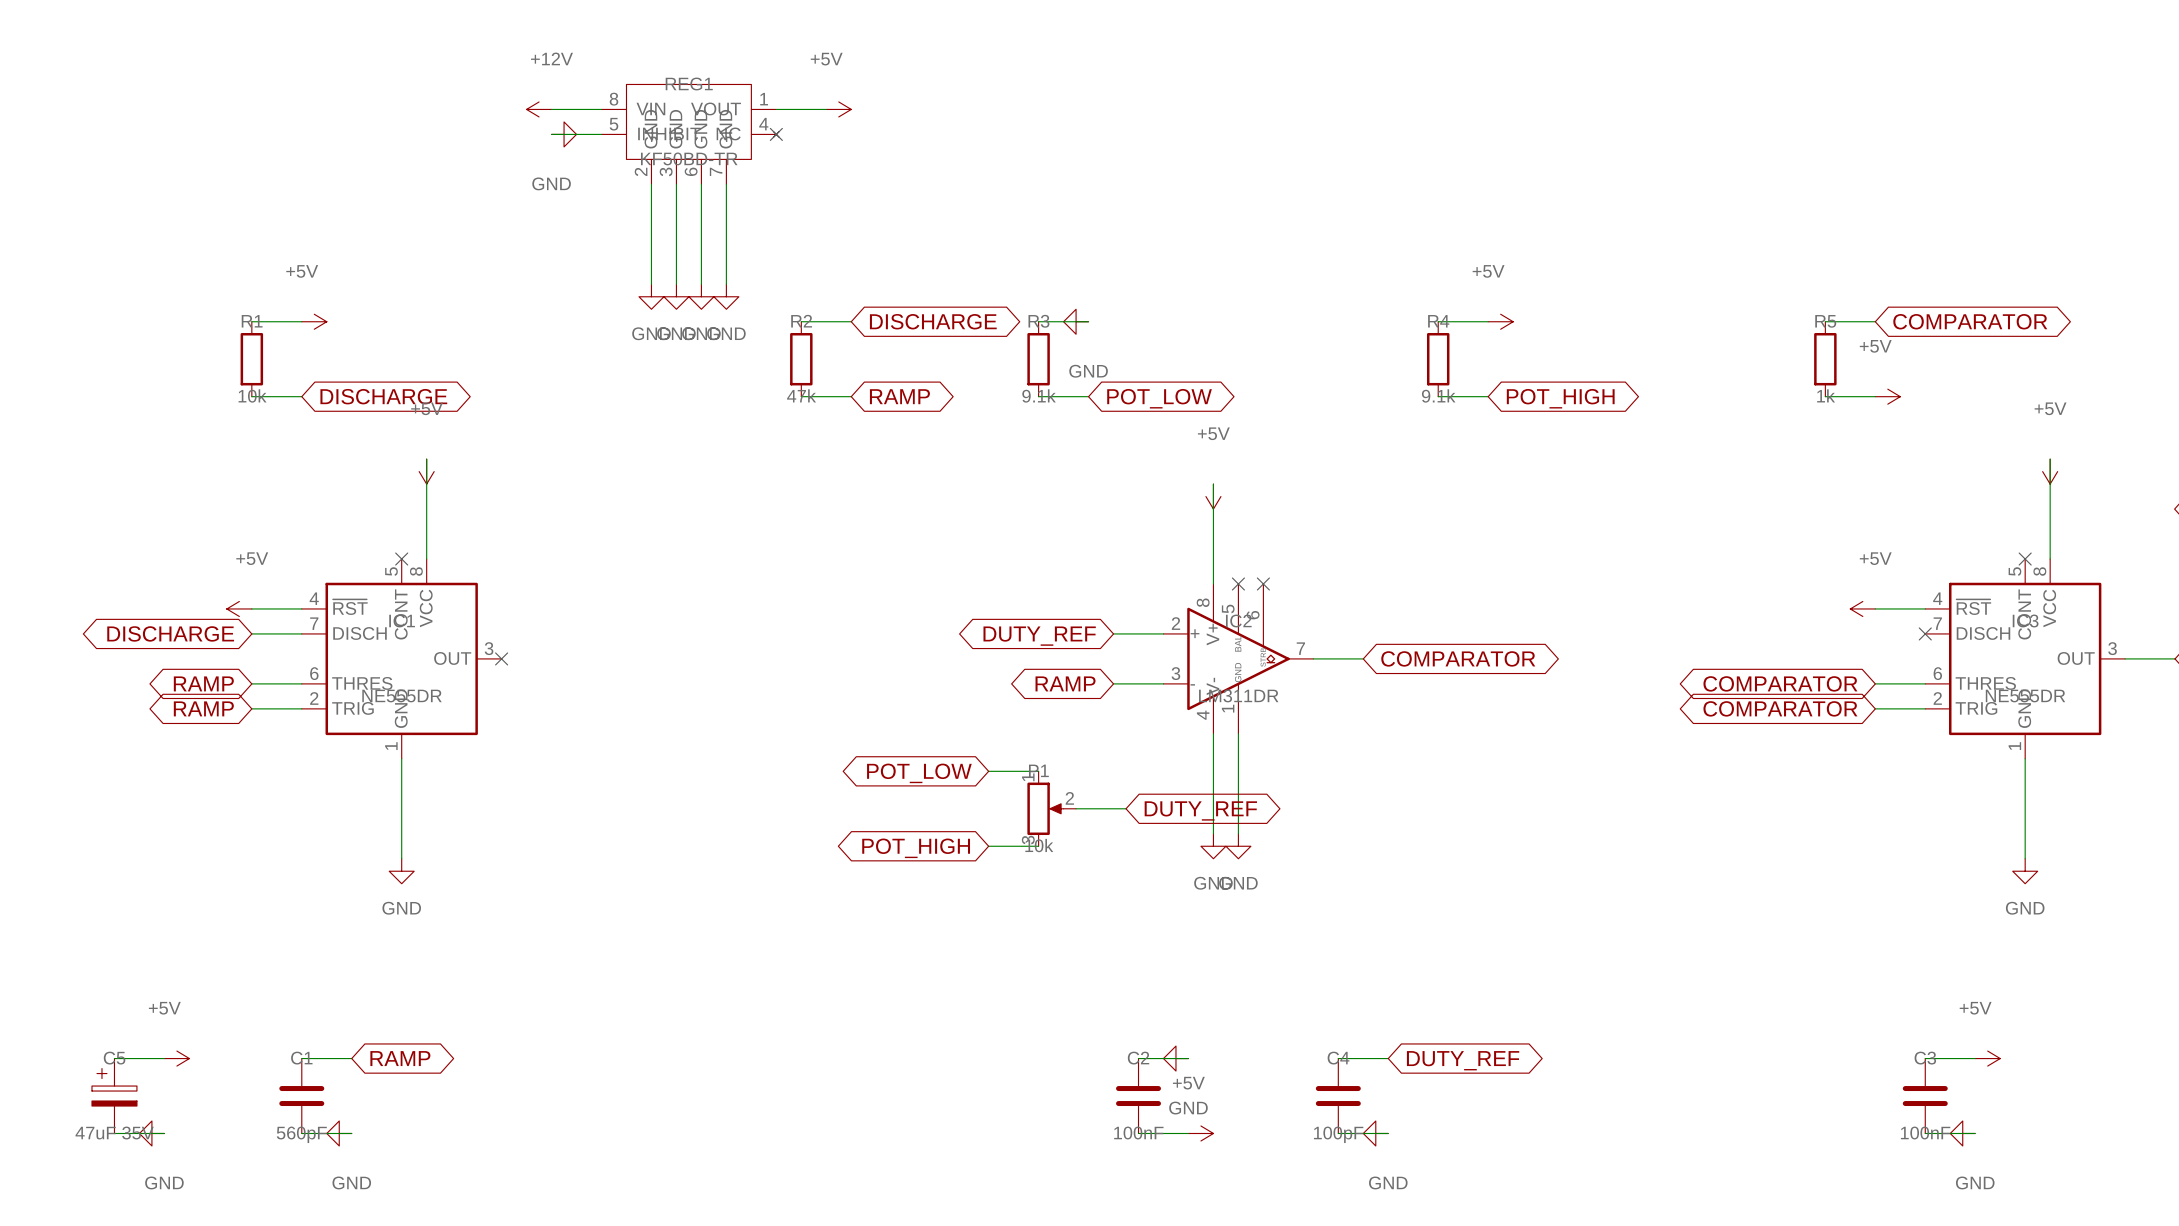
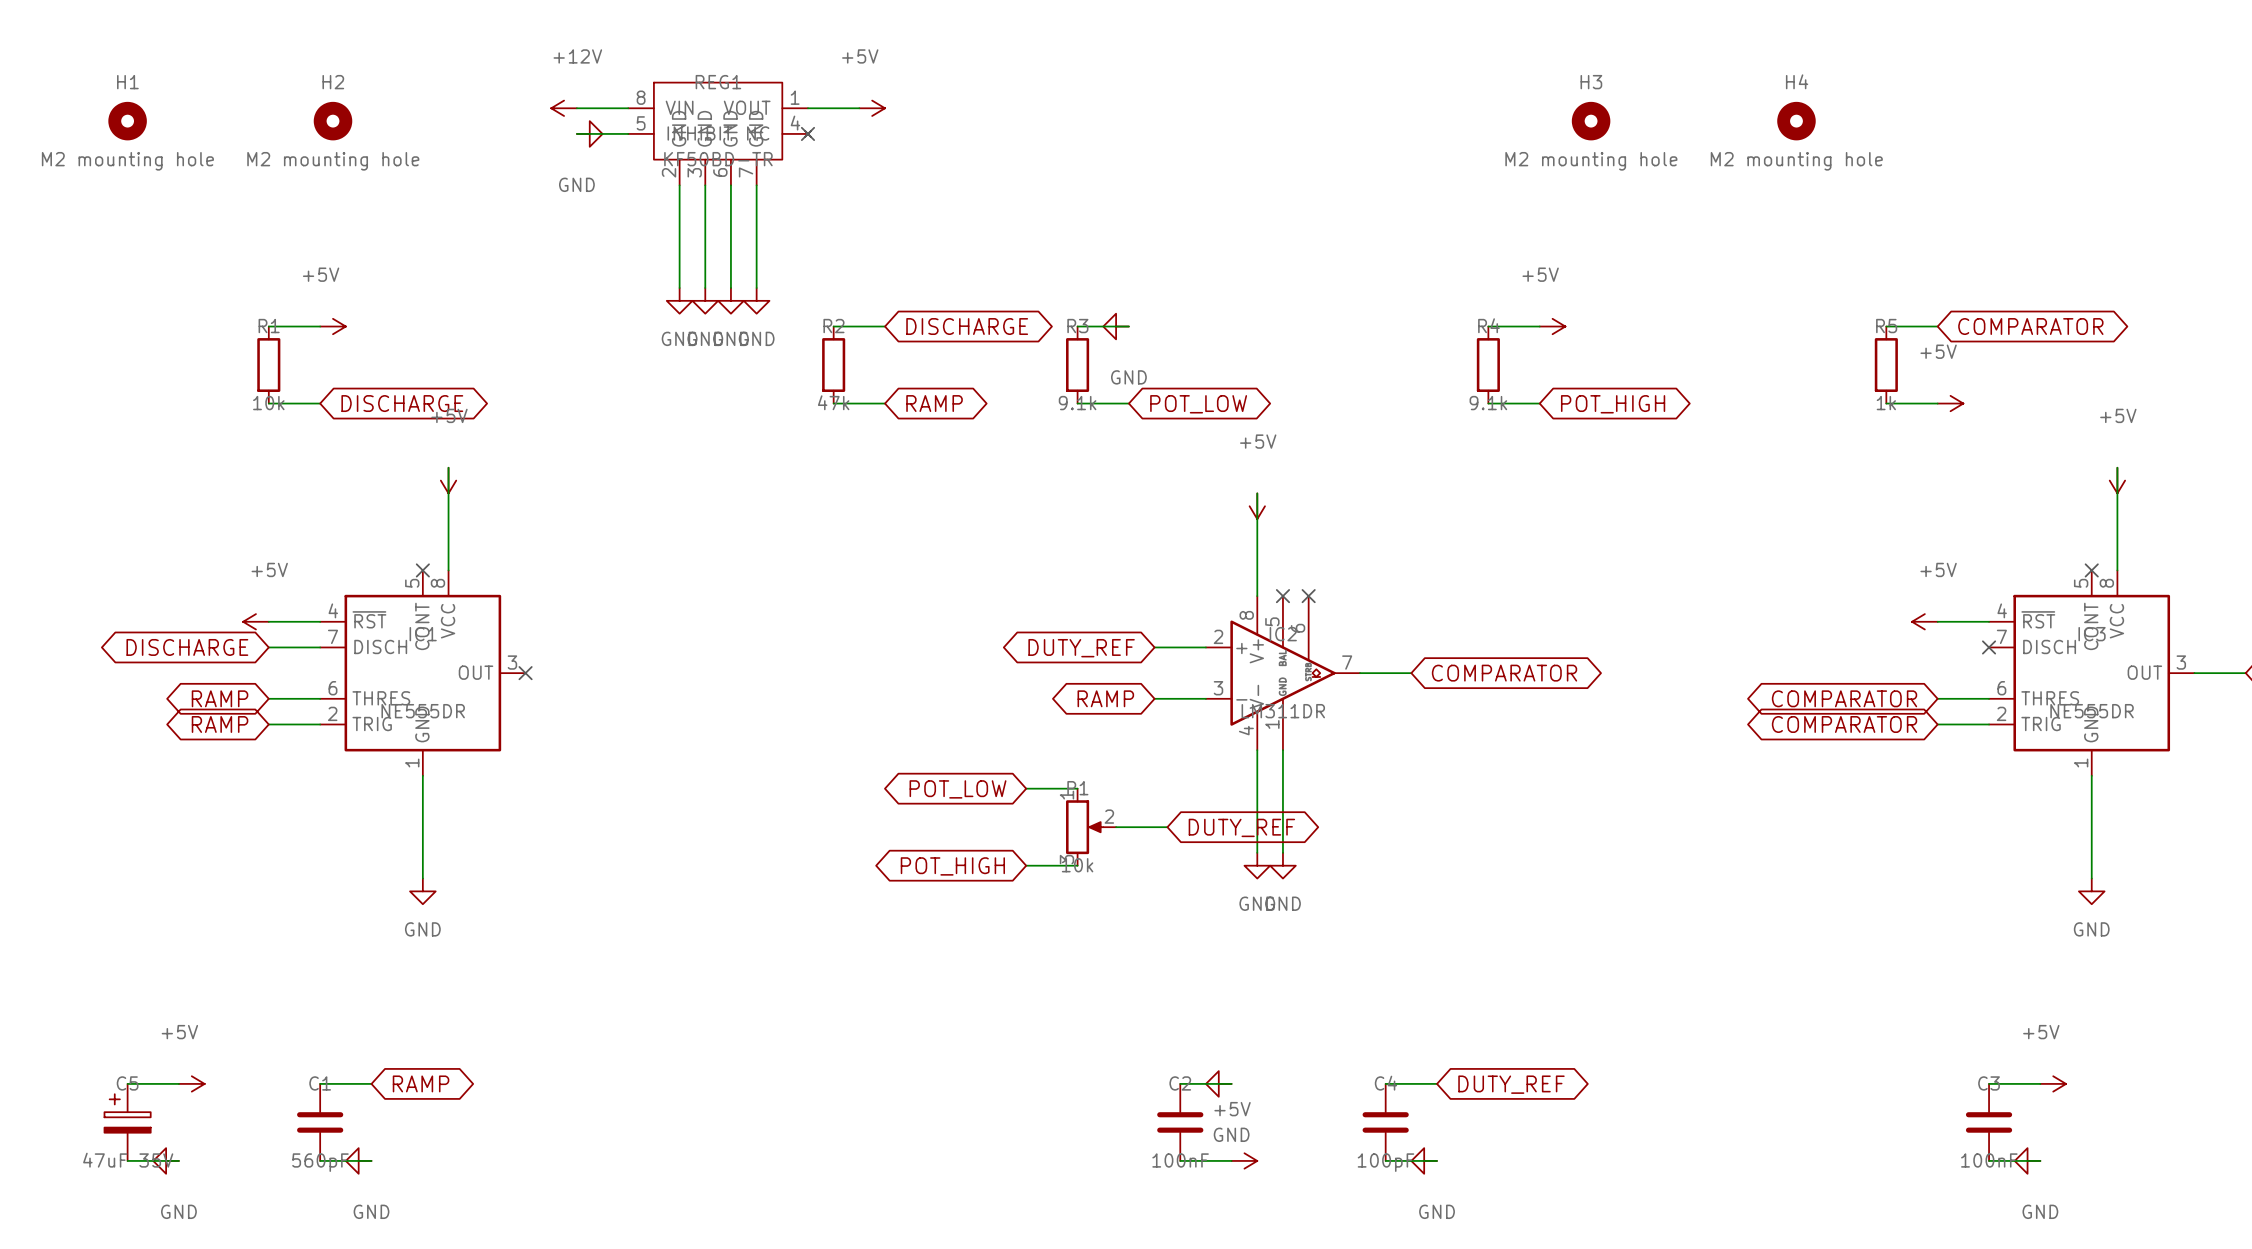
H1: none -> M2 mounting hole (127, 121)
H2: none -> M2 mounting hole (333, 121)
H3: none -> M2 mounting hole (1591, 121)
H4: none -> M2 mounting hole (1796, 121)

